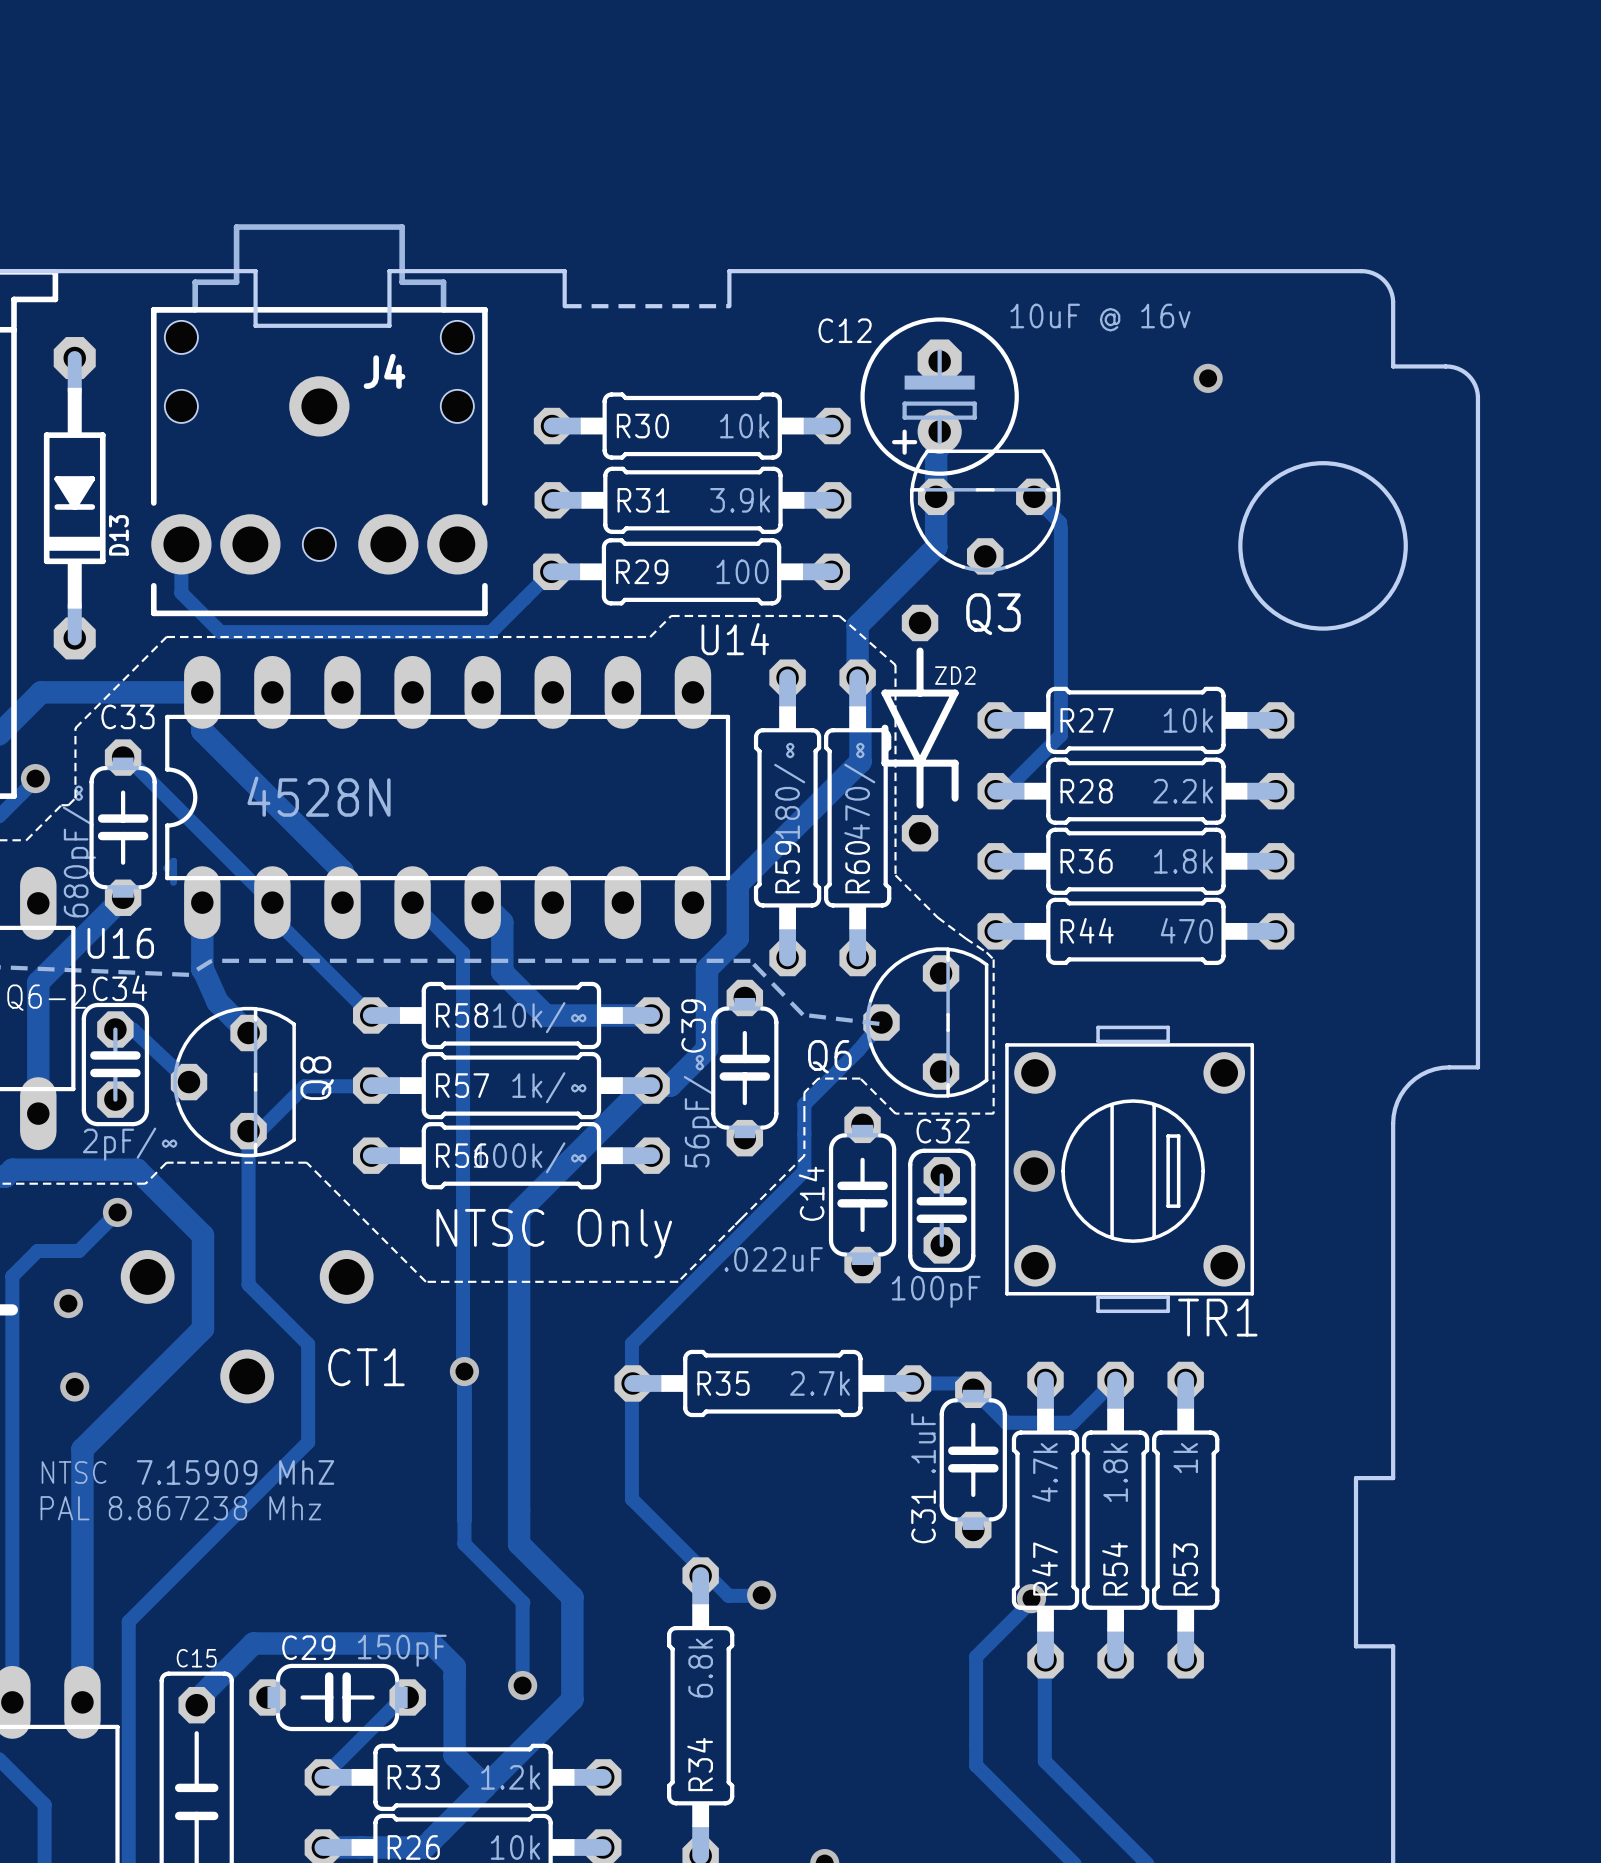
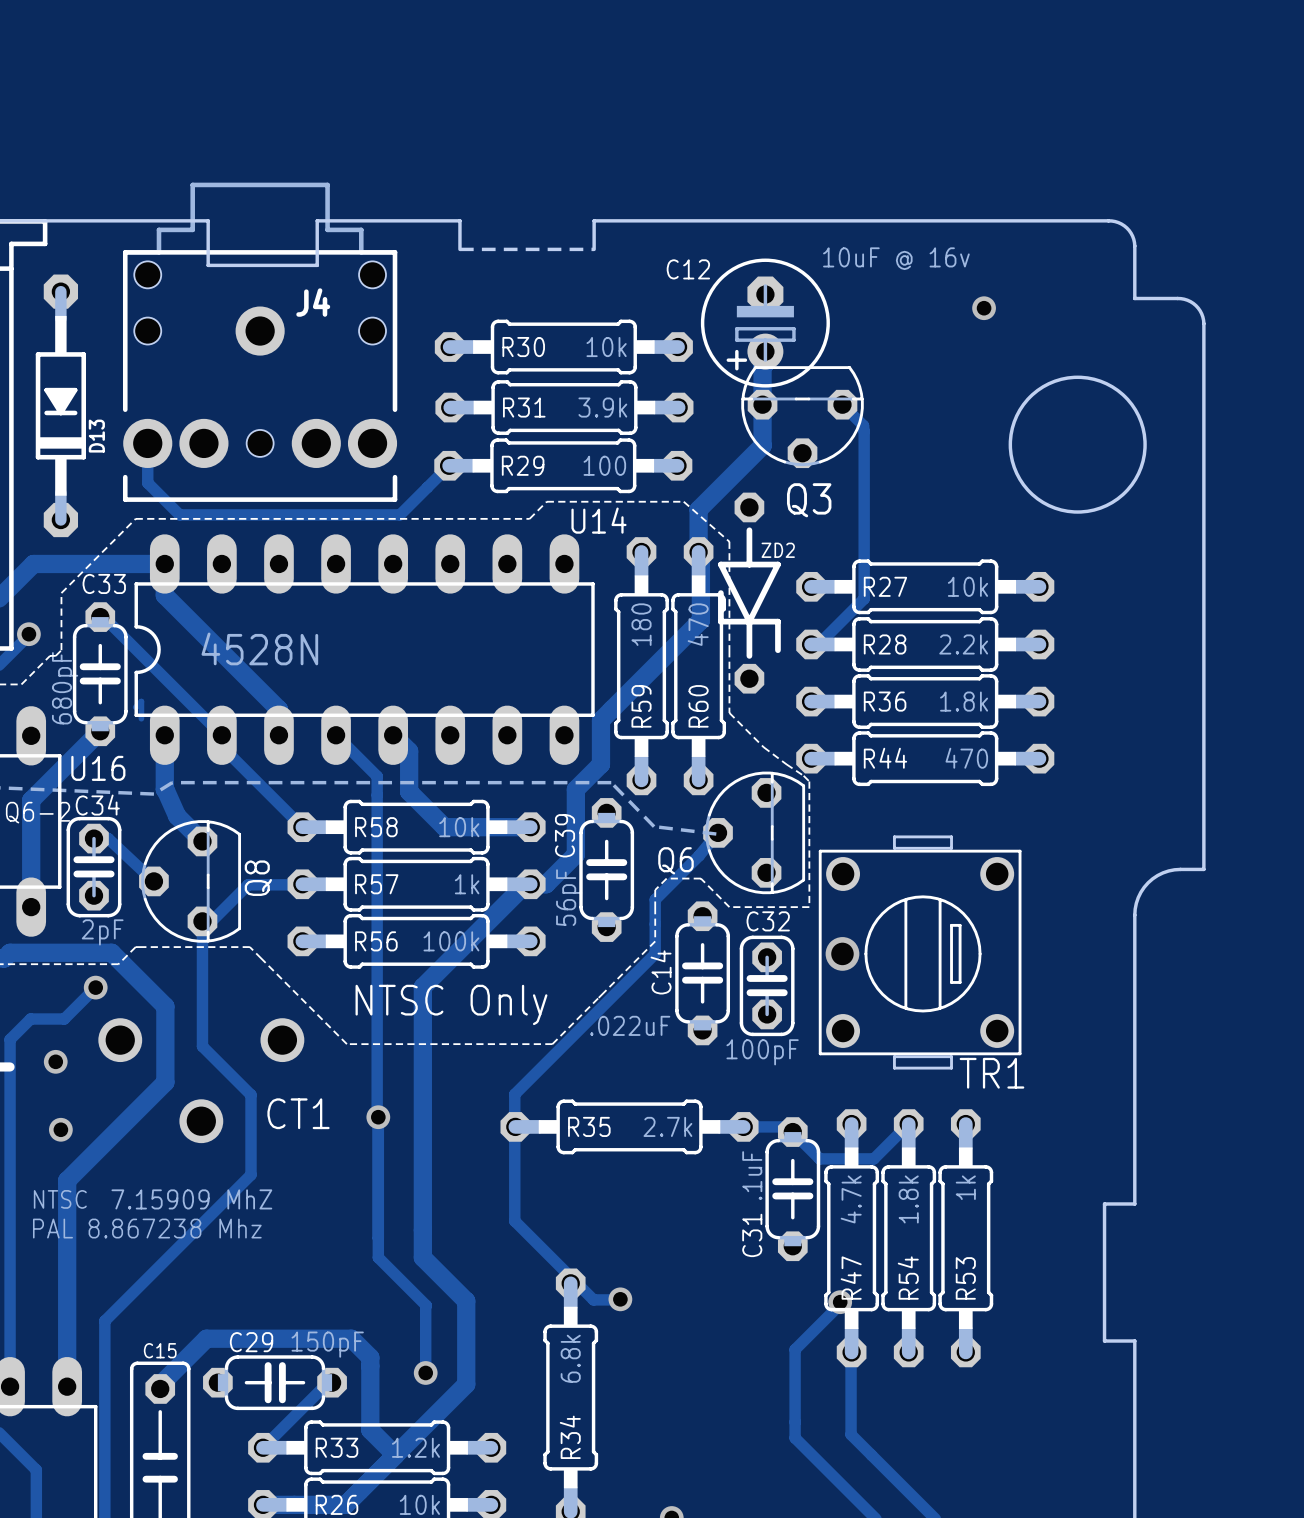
R59 value: 180/∞ (789, 790) -> 180 (641, 624)
R60 value: 470/∞ (859, 790) -> 470 (698, 624)
C33 value: 680pF/∞ (79, 851) -> 680pF (65, 688)
R58 value: 10k/∞ (539, 1017) -> 10k (459, 827)
R57 value: 1k/∞ (549, 1087) -> 1k (467, 884)
C39 value: 56pF/∞ (700, 1111) -> 56pF (569, 897)
C34 value: 2pF/∞ (130, 1144) -> 2pF (102, 932)
R56 value: 100k/∞ (530, 1157) -> 100k (451, 941)

